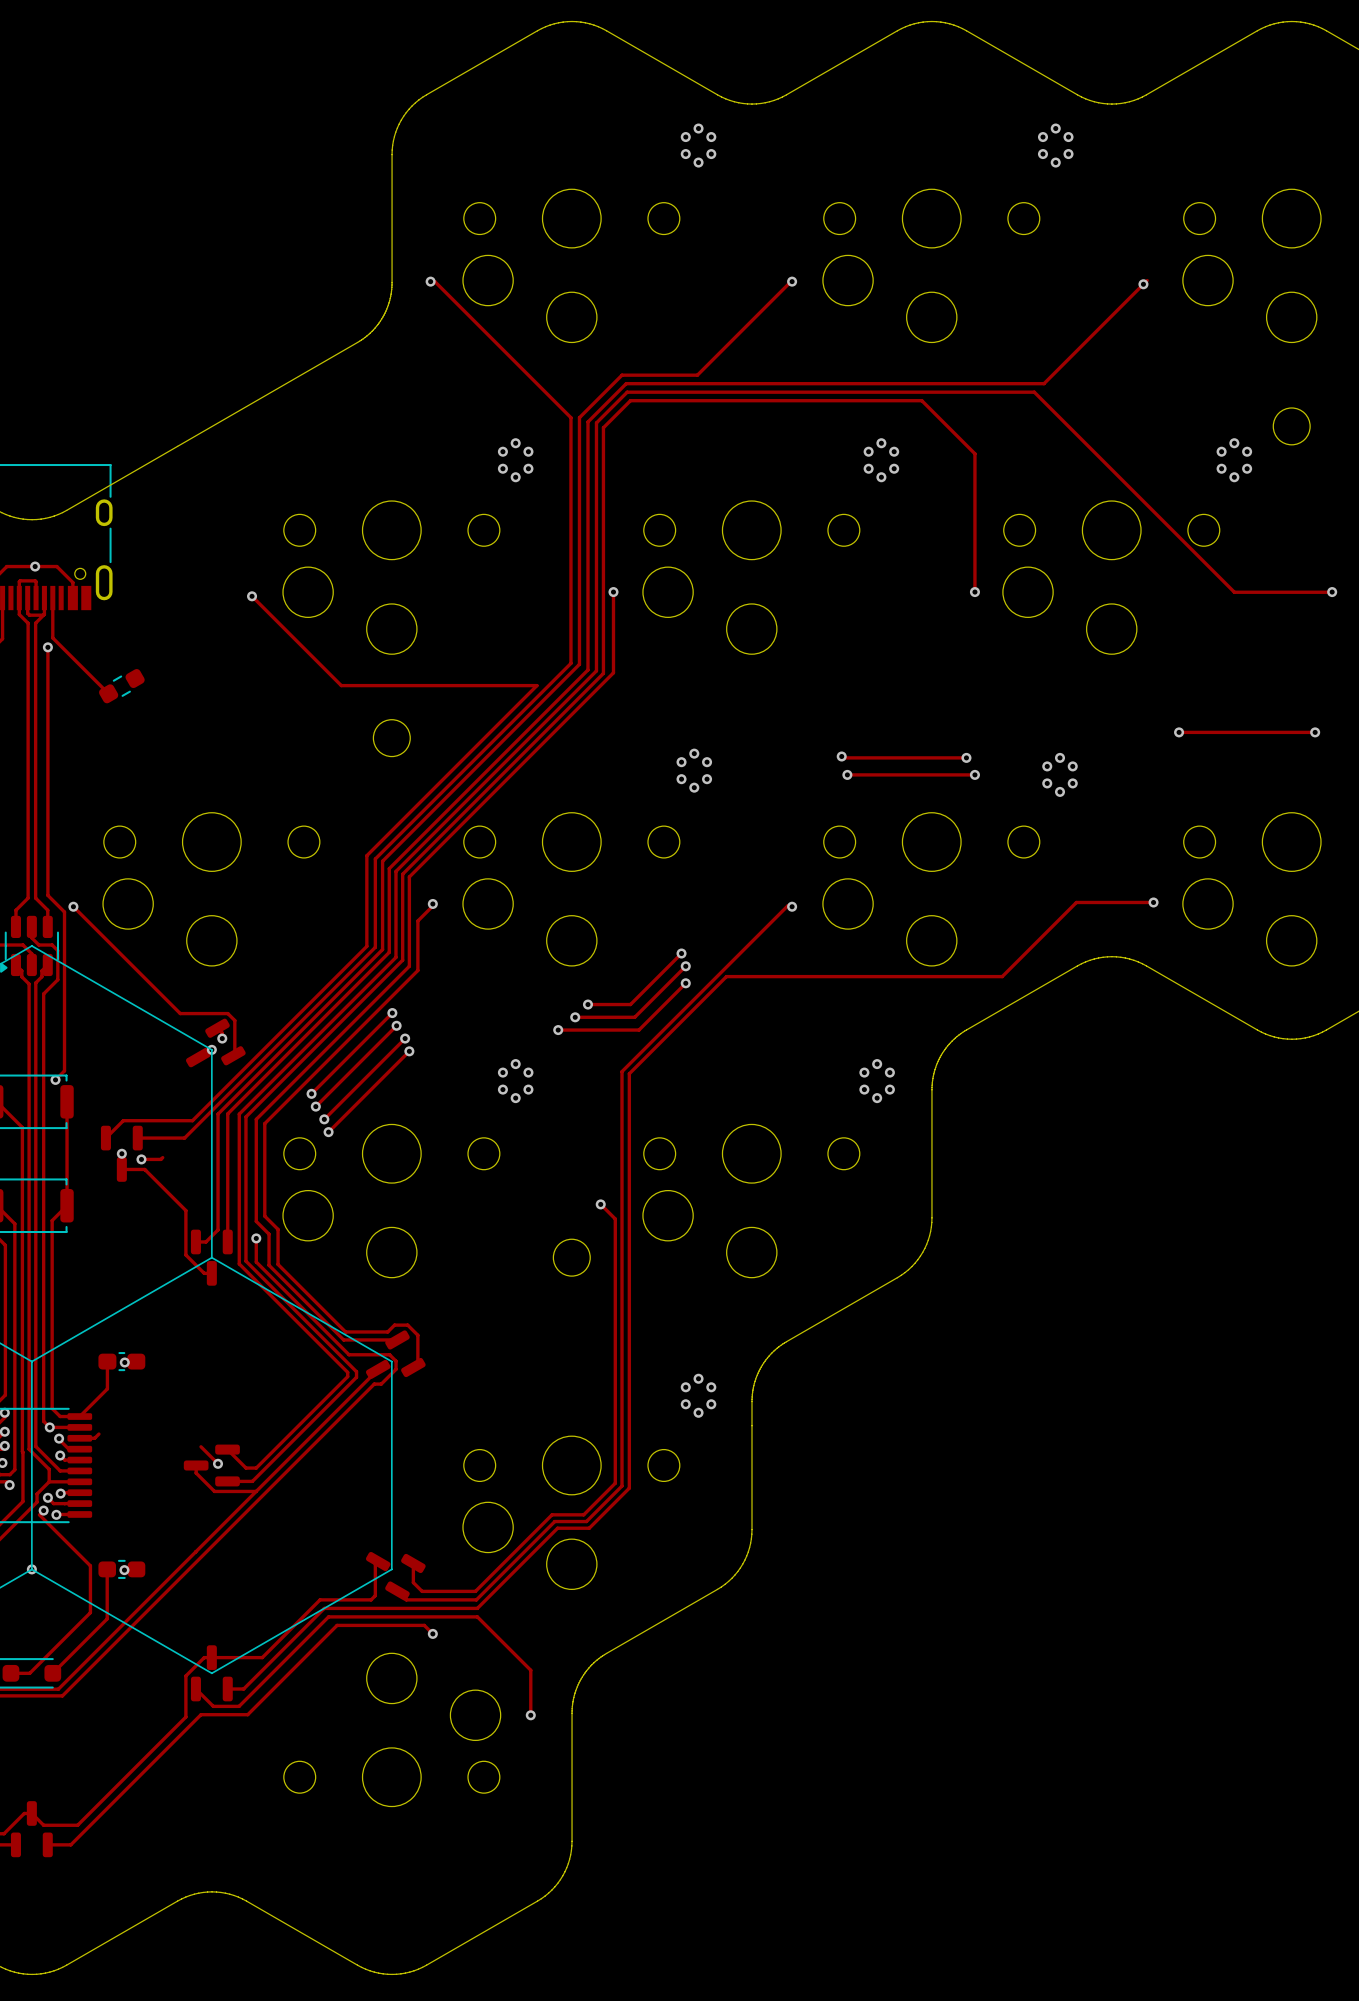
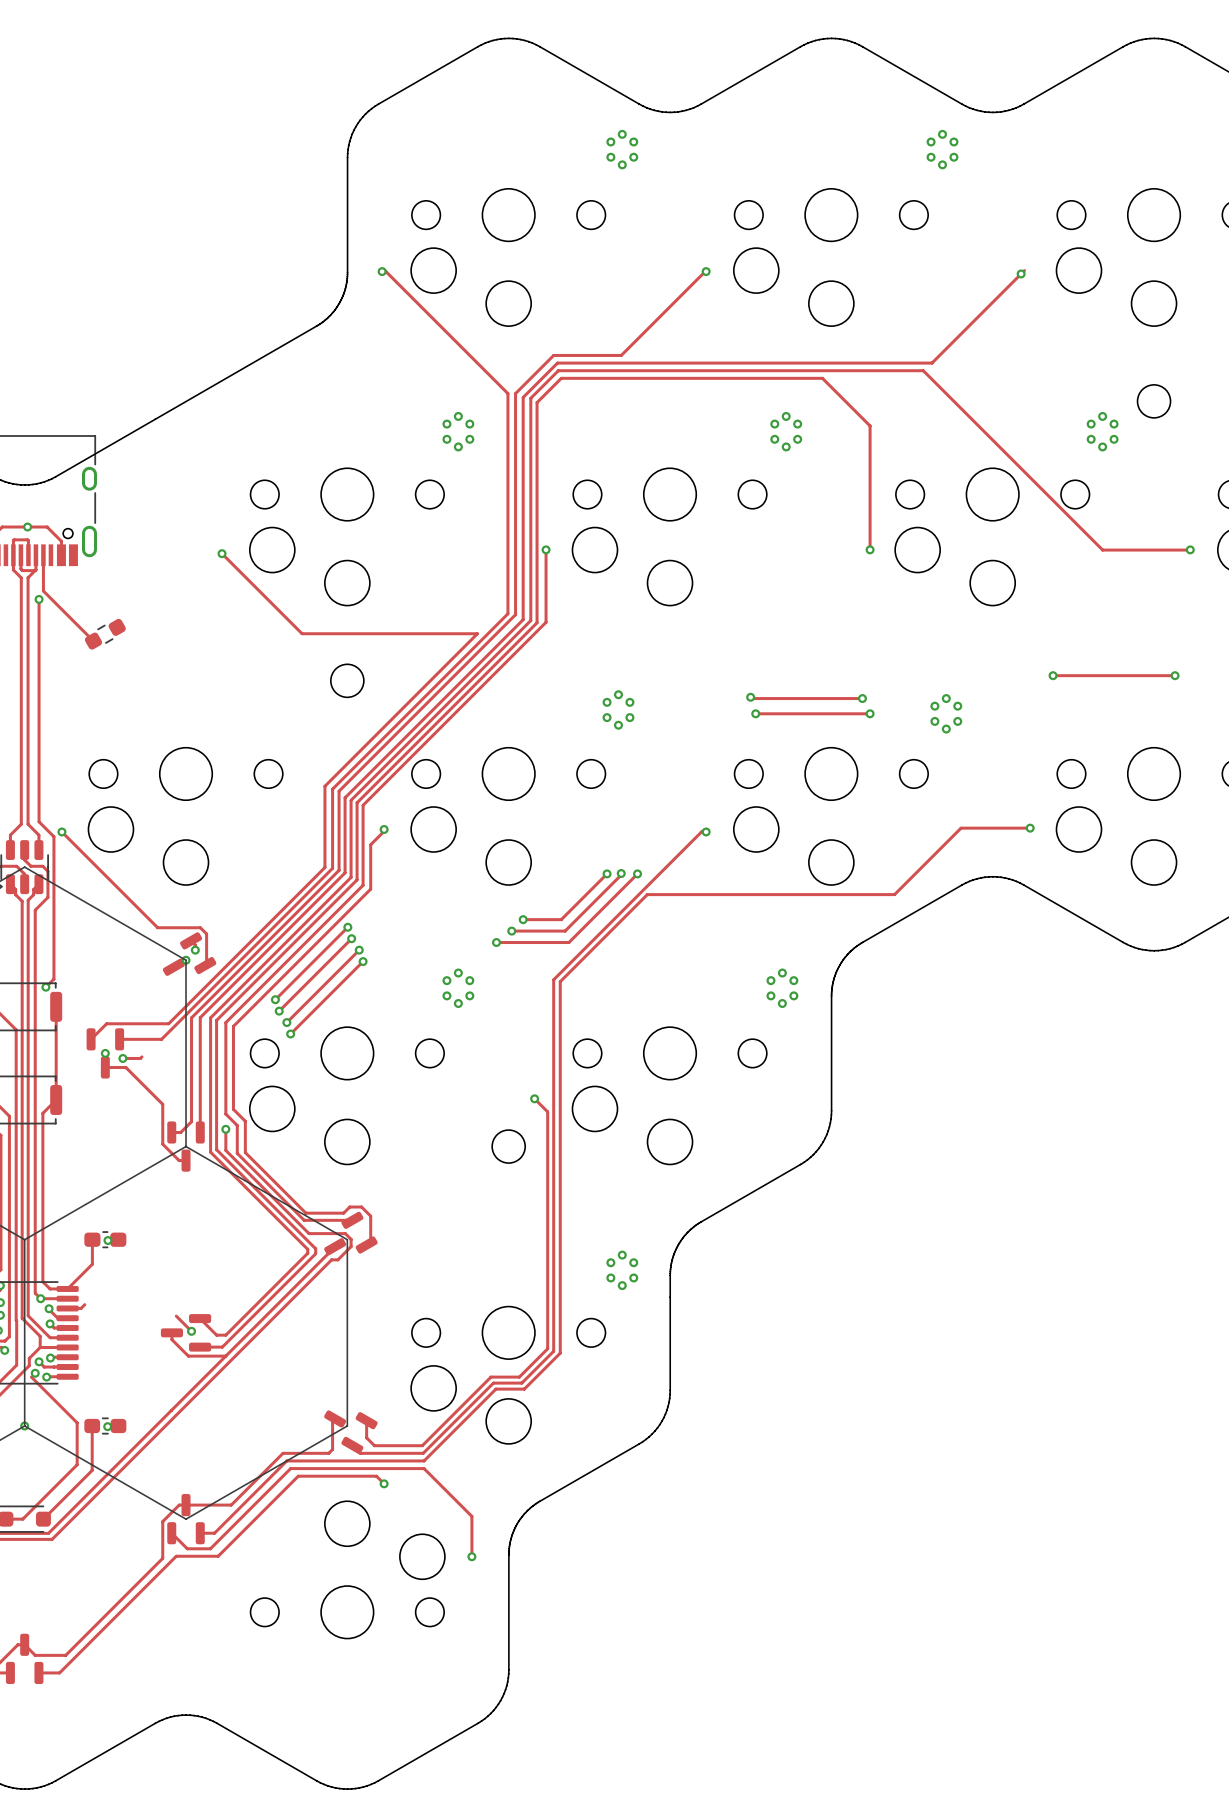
track: none -> (621, 873) (610, 885)
via: none -> (621, 873)
track: none -> (637, 873) (610, 900)
via: none -> (637, 873)
via: (685, 966) -> none
via: (685, 983) -> none

